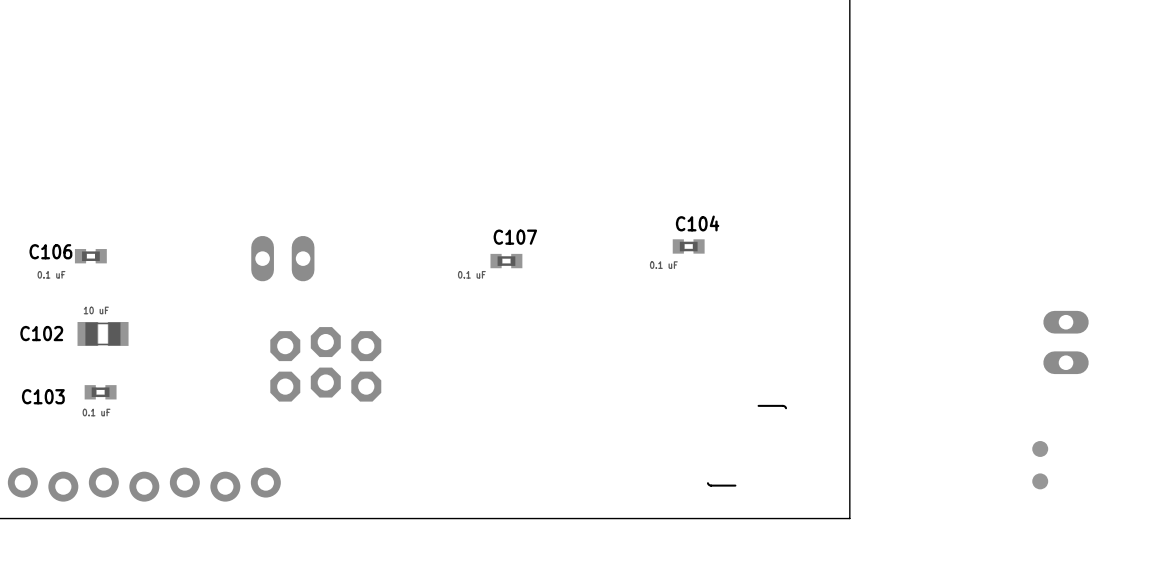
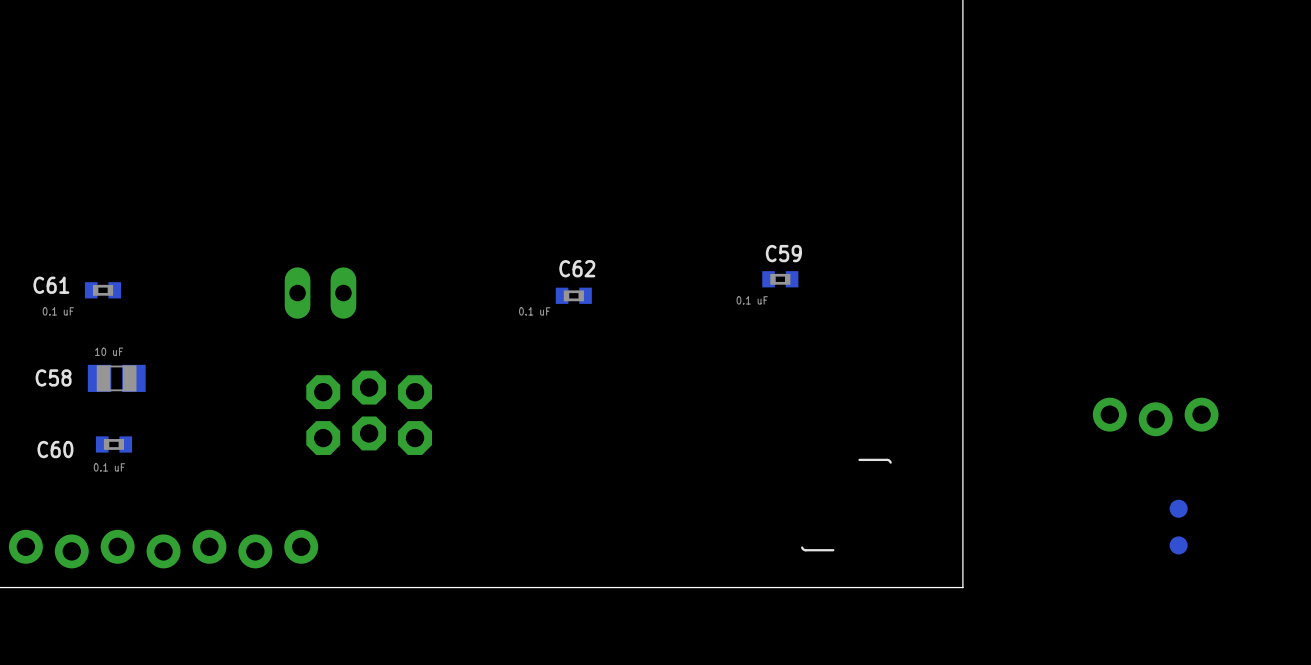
C104 name: C104 (697, 223) -> C59 (783, 253)
C107 name: C107 (515, 237) -> C62 (577, 268)
C106 name: C106 (50, 251) -> C61 (51, 285)
C102 name: C102 (41, 333) -> C58 (53, 377)
part: (1066, 342) -> none
part: none -> (1155, 416)
C103 name: C103 (43, 396) -> C60 (55, 449)

